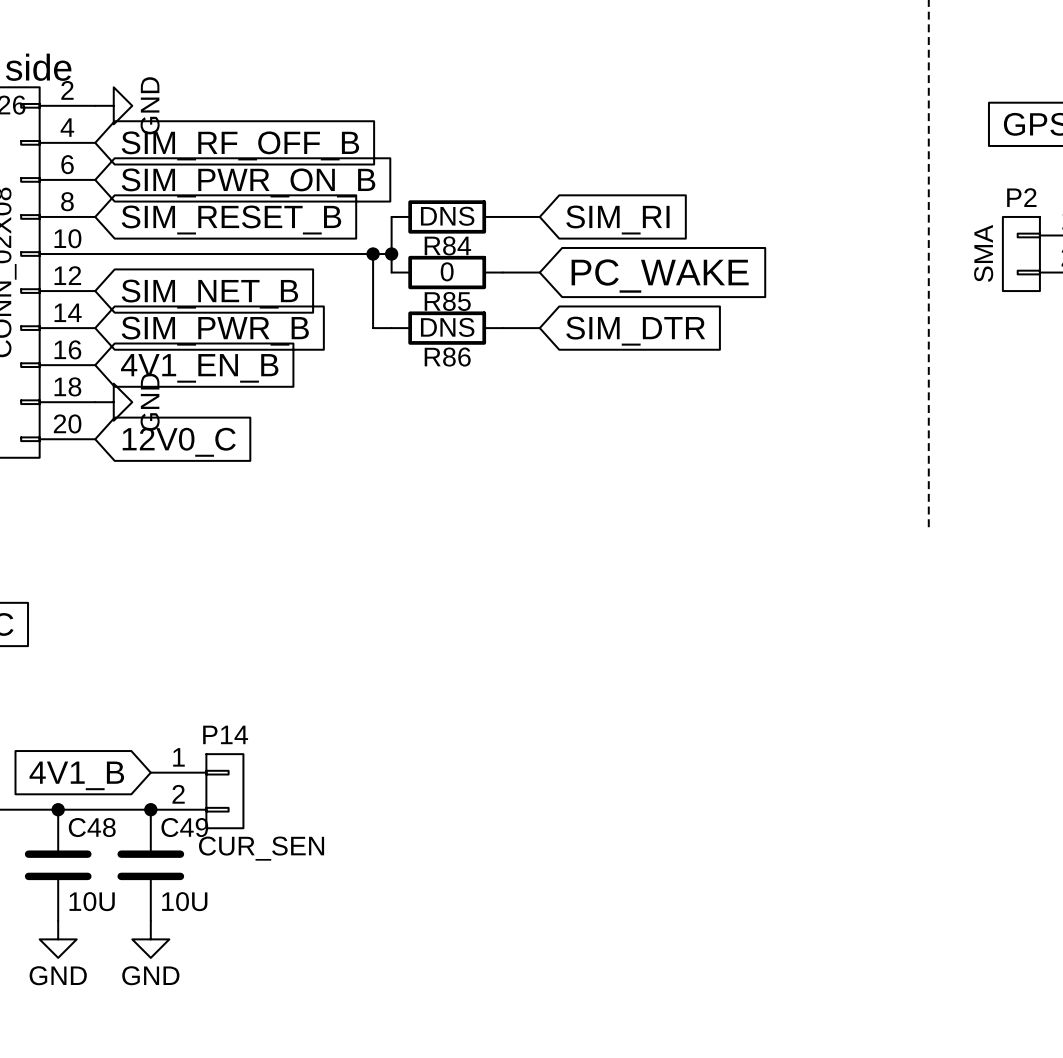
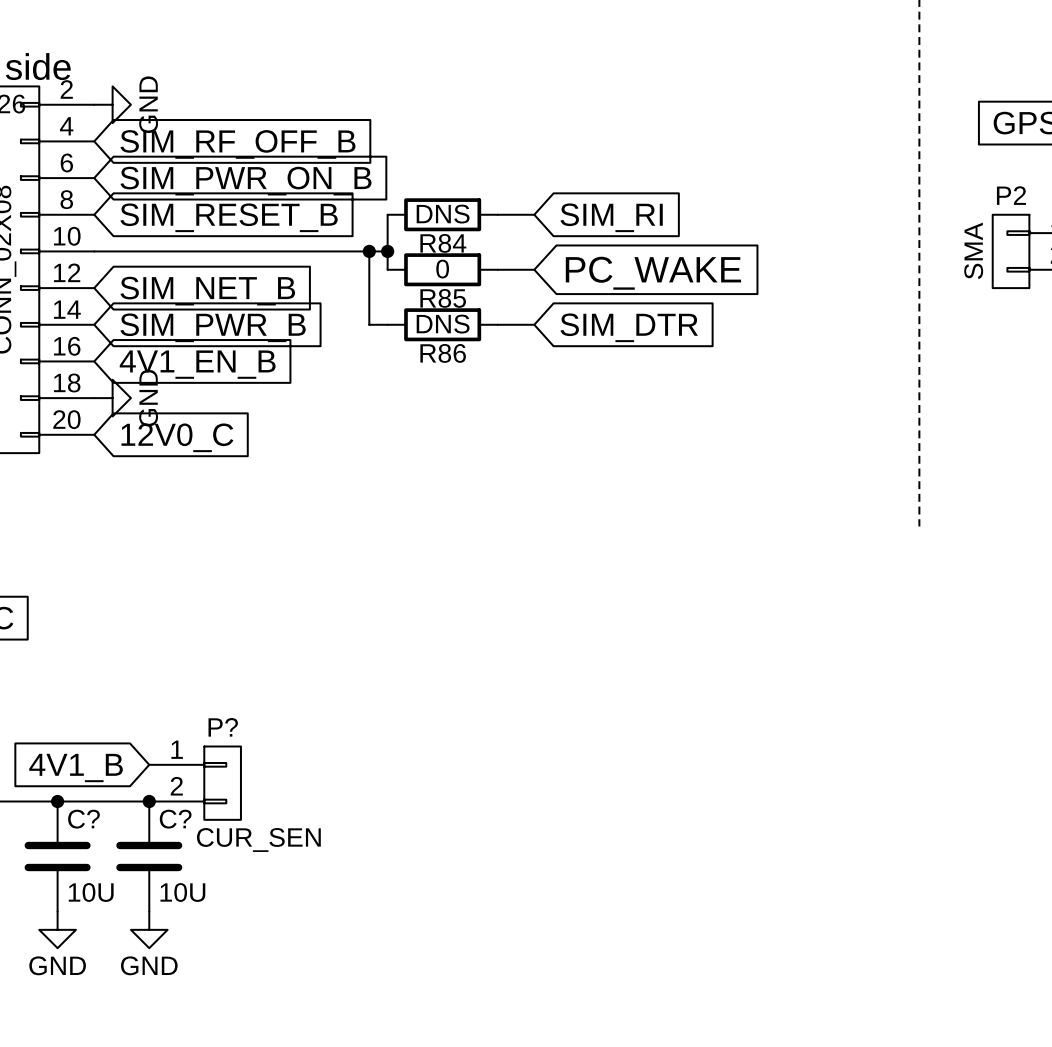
P14 name: P14 (225, 734) -> P? (223, 727)
C48 name: C48 (92, 827) -> C? (83, 819)
C49 name: C49 (184, 827) -> C? (175, 819)

